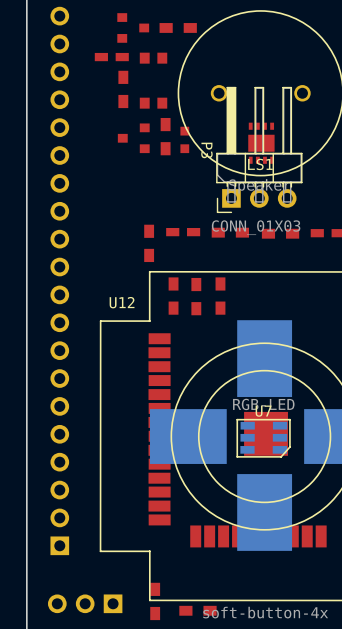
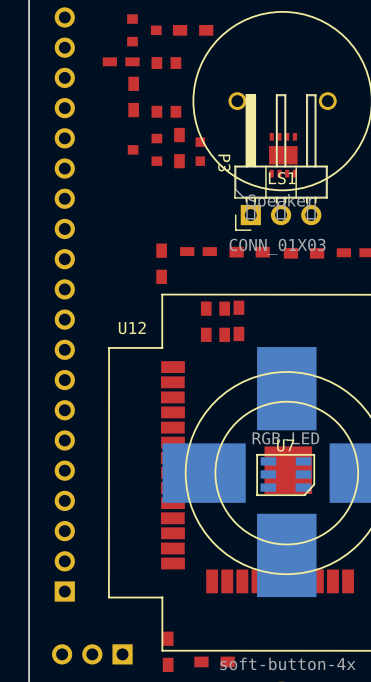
part: (173, 296) -> none
part: none -> (206, 321)
part: (196, 296) -> none
part: none -> (224, 321)

